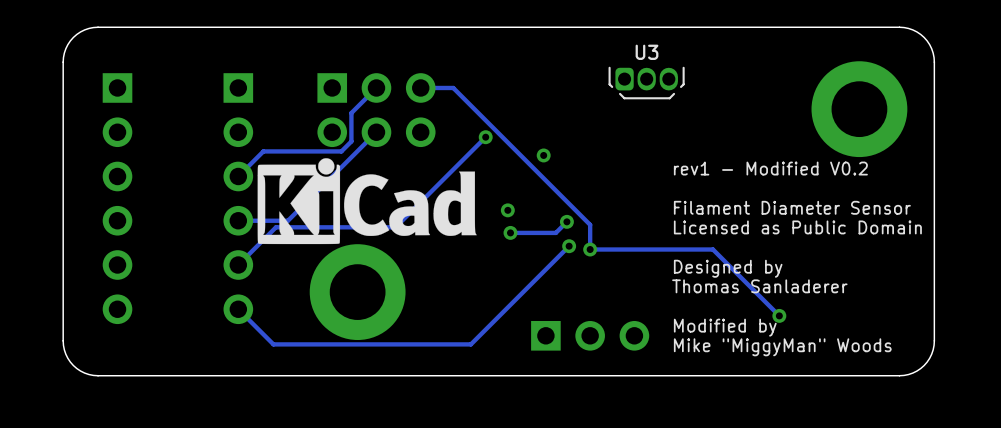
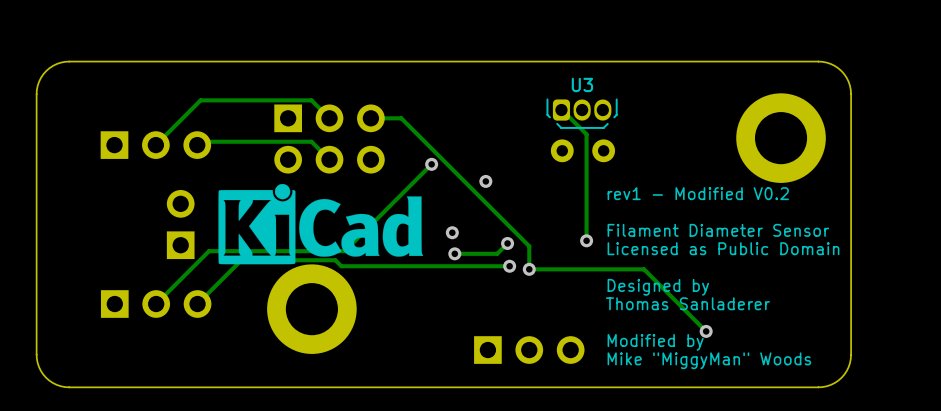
track: none -> (561, 110) (586, 134) (586, 240)
track: (376, 87) (351, 113) (351, 141) (341, 151) (263, 151) (238, 176) -> (329, 118) (311, 100) (200, 100) (155, 145)
part: none -> (155, 145)
part: none -> (582, 150)
track: (376, 132) (287, 220) (238, 220) -> (329, 159) (311, 141) (200, 141) (197, 145)
part: (117, 198) -> none
part: (238, 198) -> none
part: none -> (180, 224)
via: none -> (586, 240)
track: (395, 227) (276, 227) (238, 265) -> (347, 248) (344, 251) (209, 251) (156, 304)
track: (569, 246) (470, 344) (273, 344) (238, 309) -> (509, 266) (341, 266) (335, 260) (241, 260) (197, 304)
part: none -> (156, 304)

